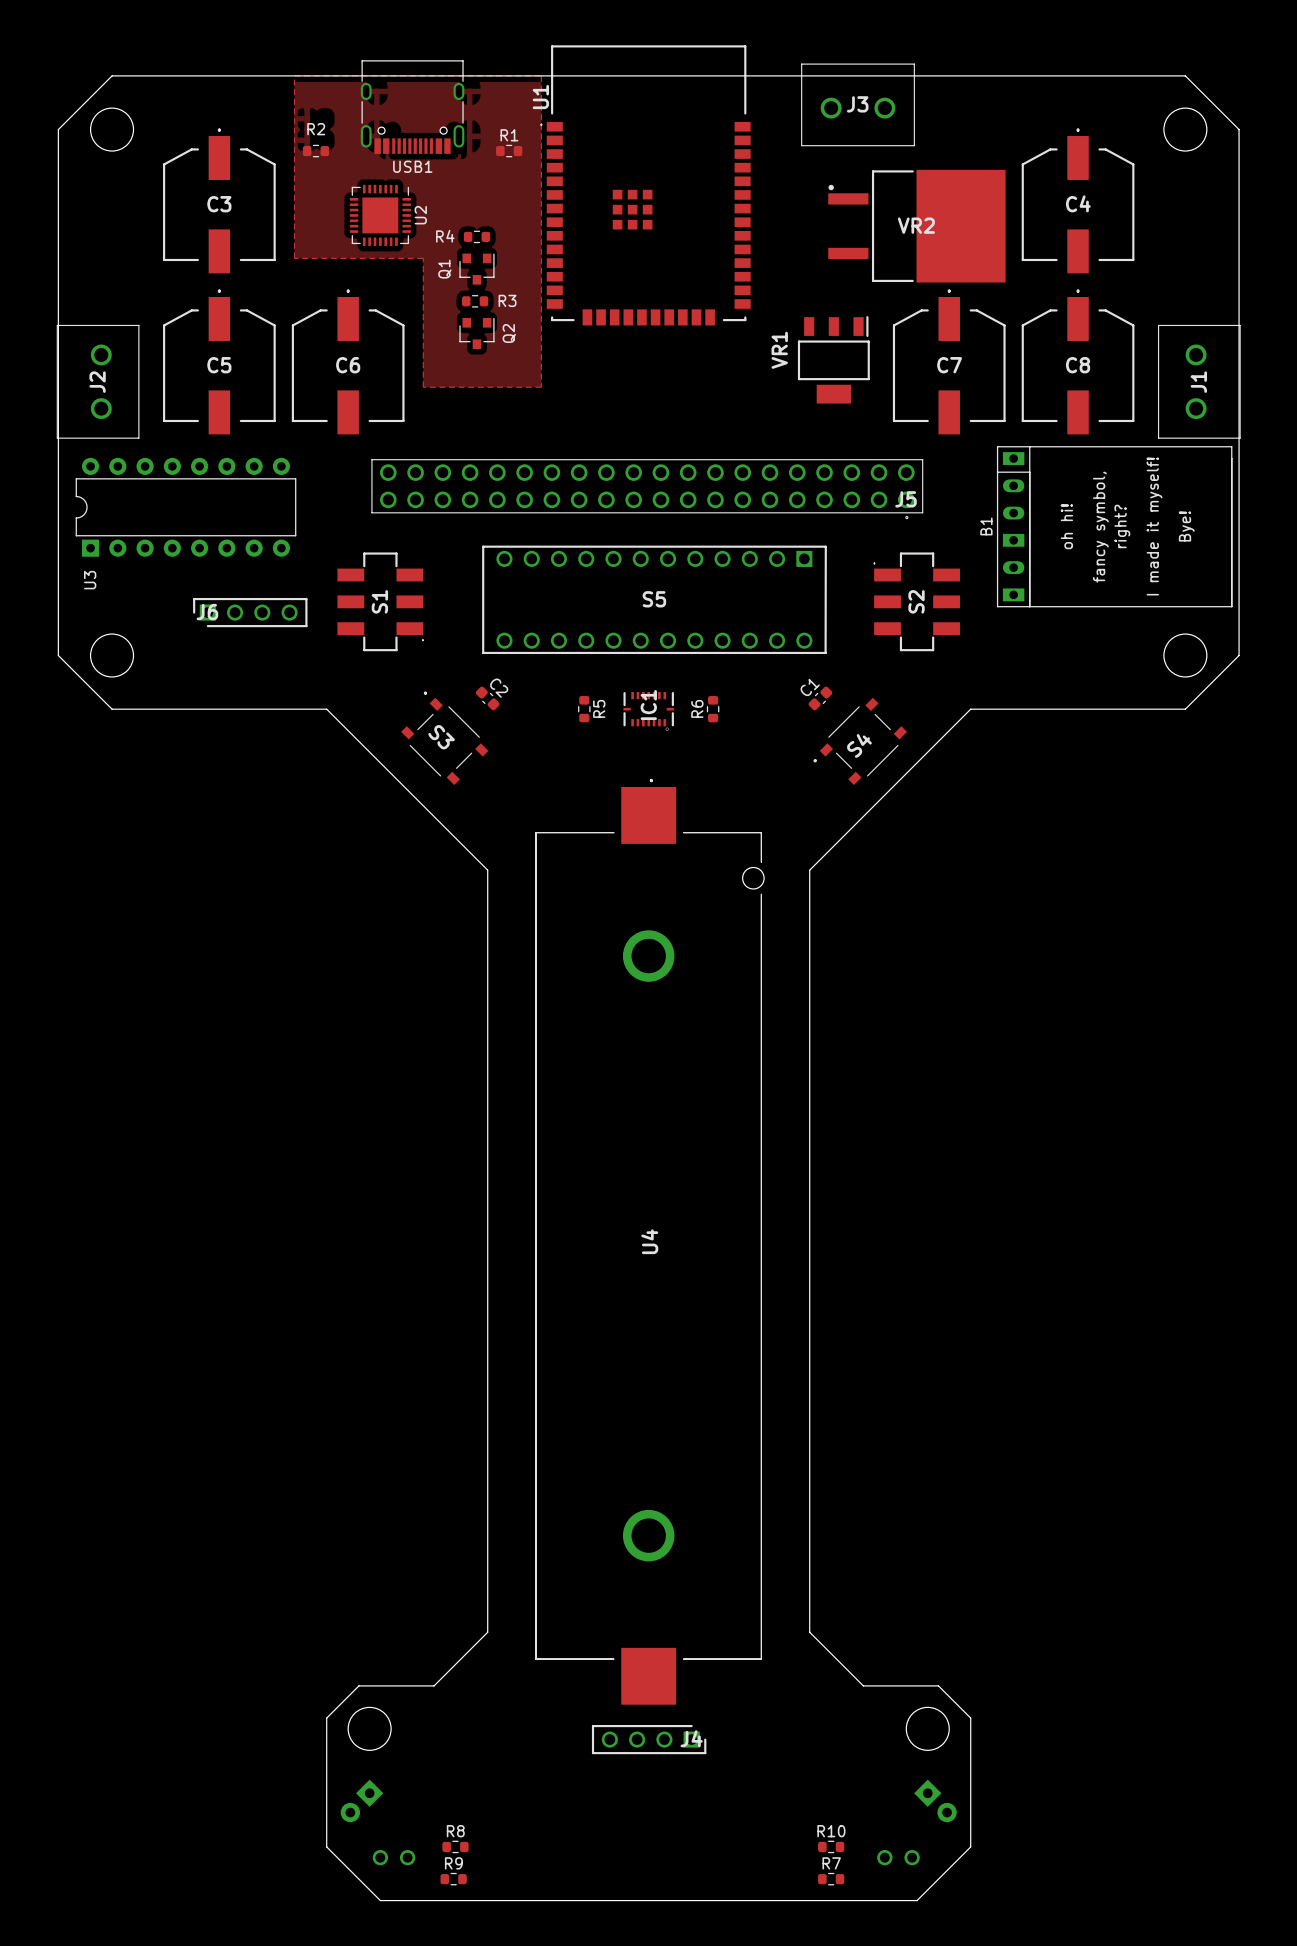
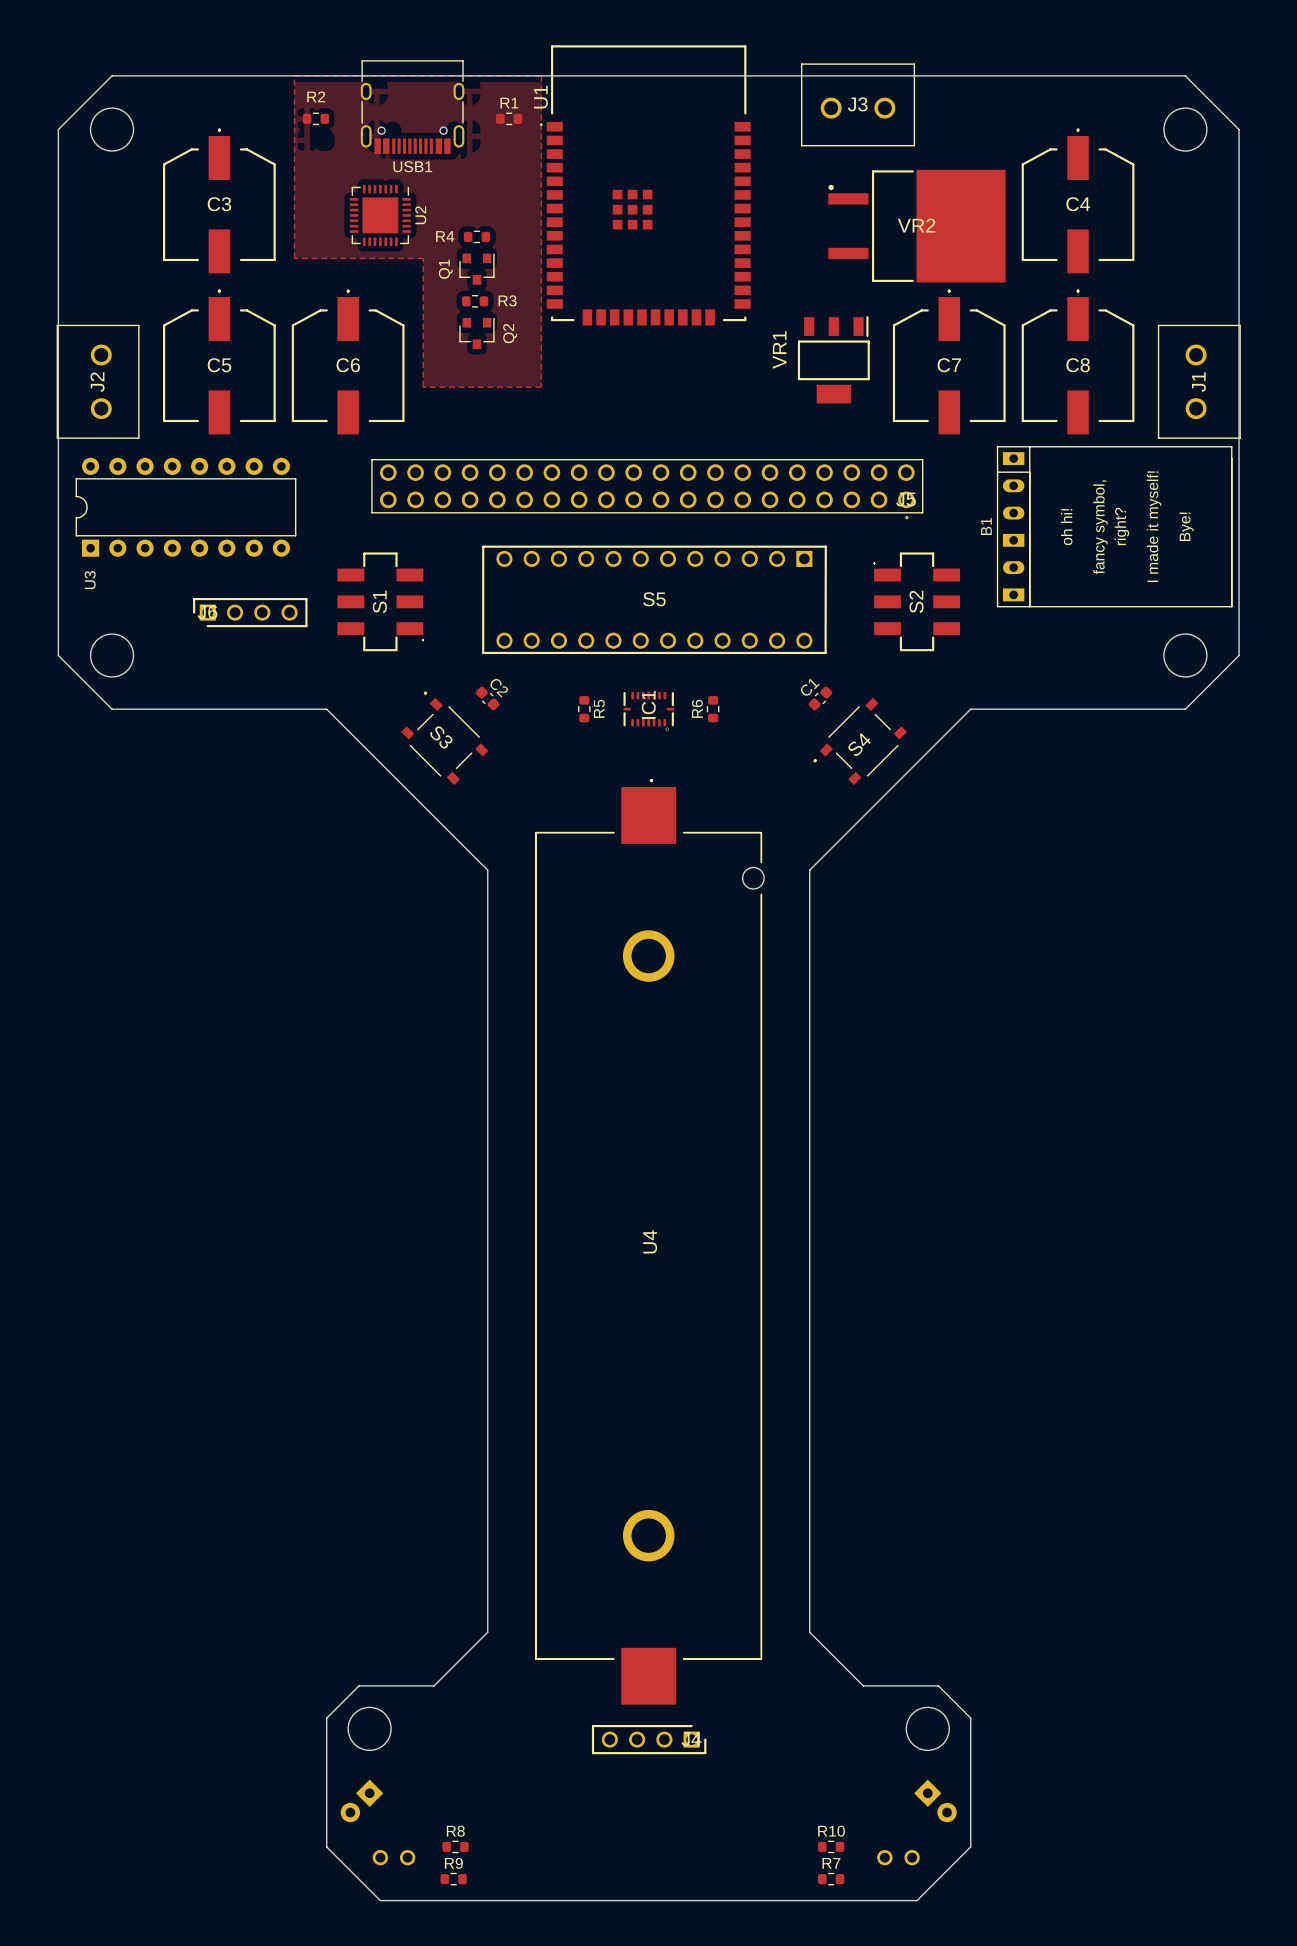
R2 position: (315, 151) -> (315, 118)
R1 position: (509, 151) -> (509, 118)

